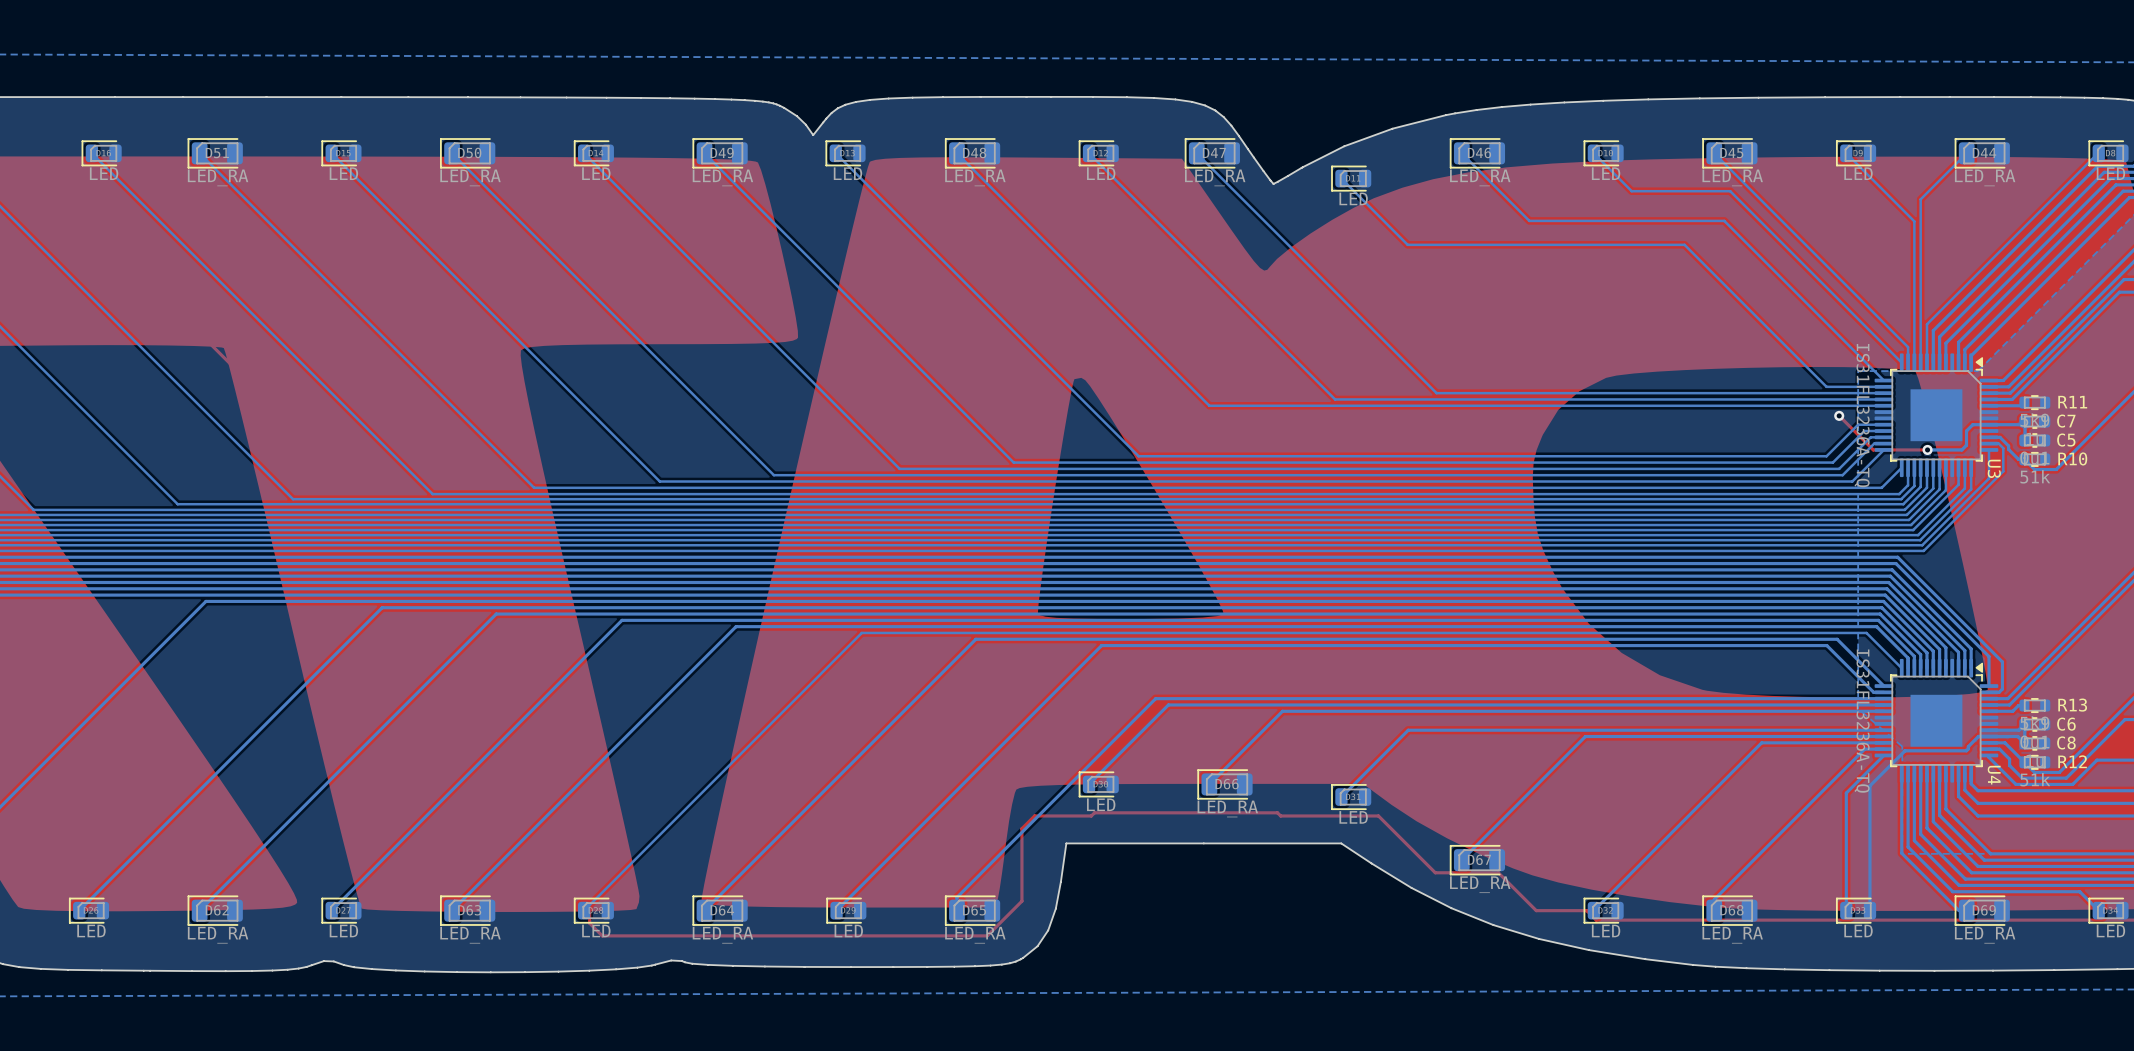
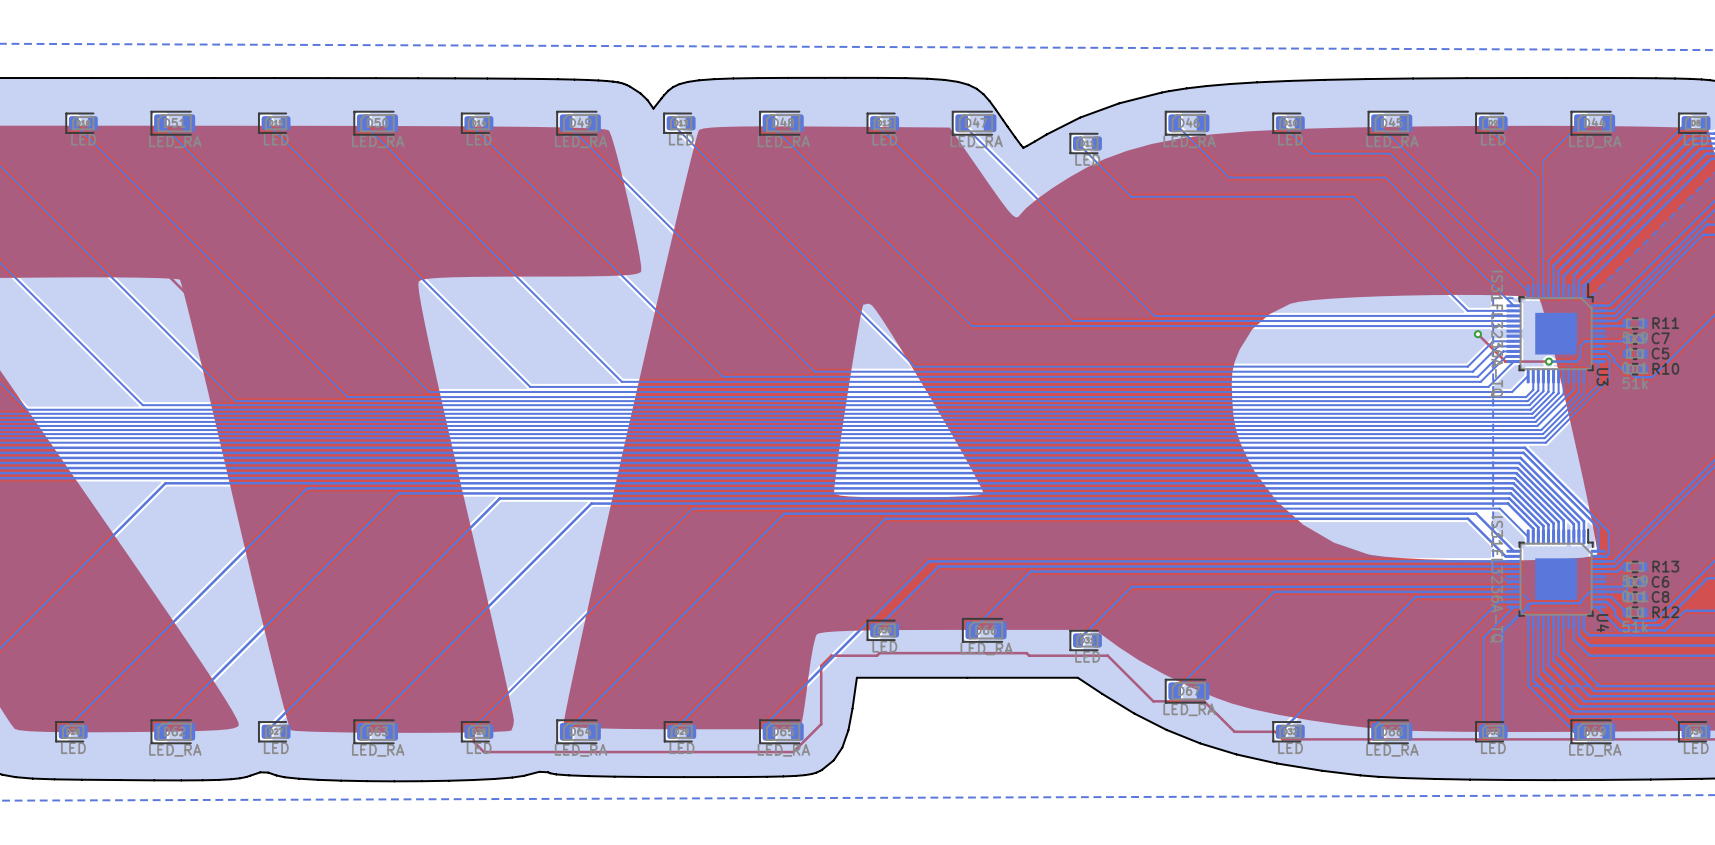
U3 footprint: [1874, 353, 1999, 478] -> [1506, 283, 1606, 384]
U4 footprint: [1874, 658, 1999, 783] -> [1506, 528, 1606, 629]

